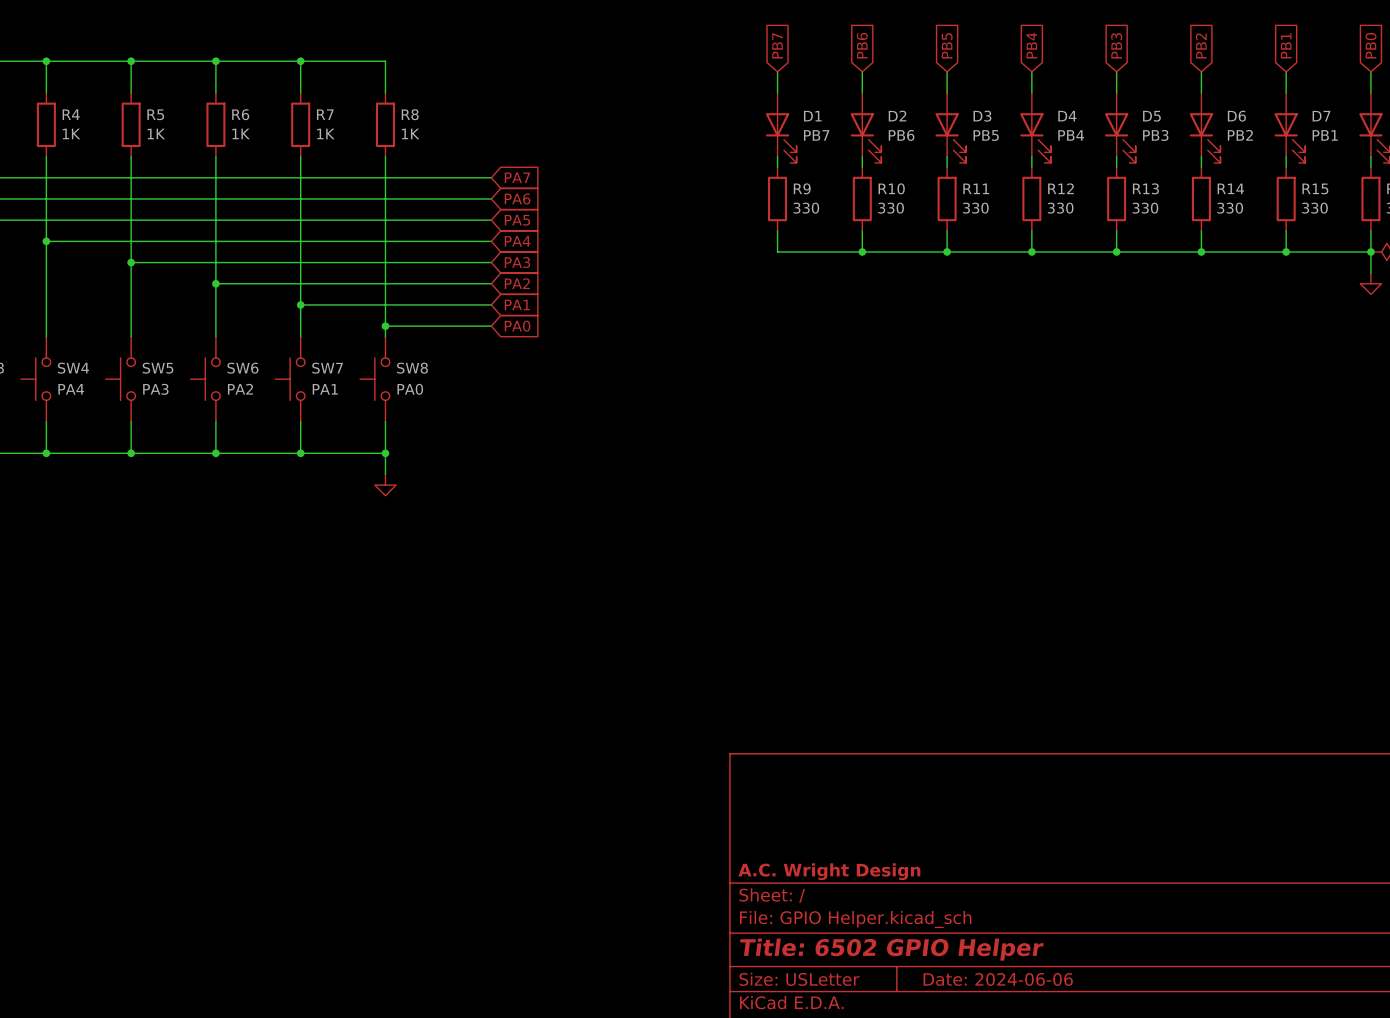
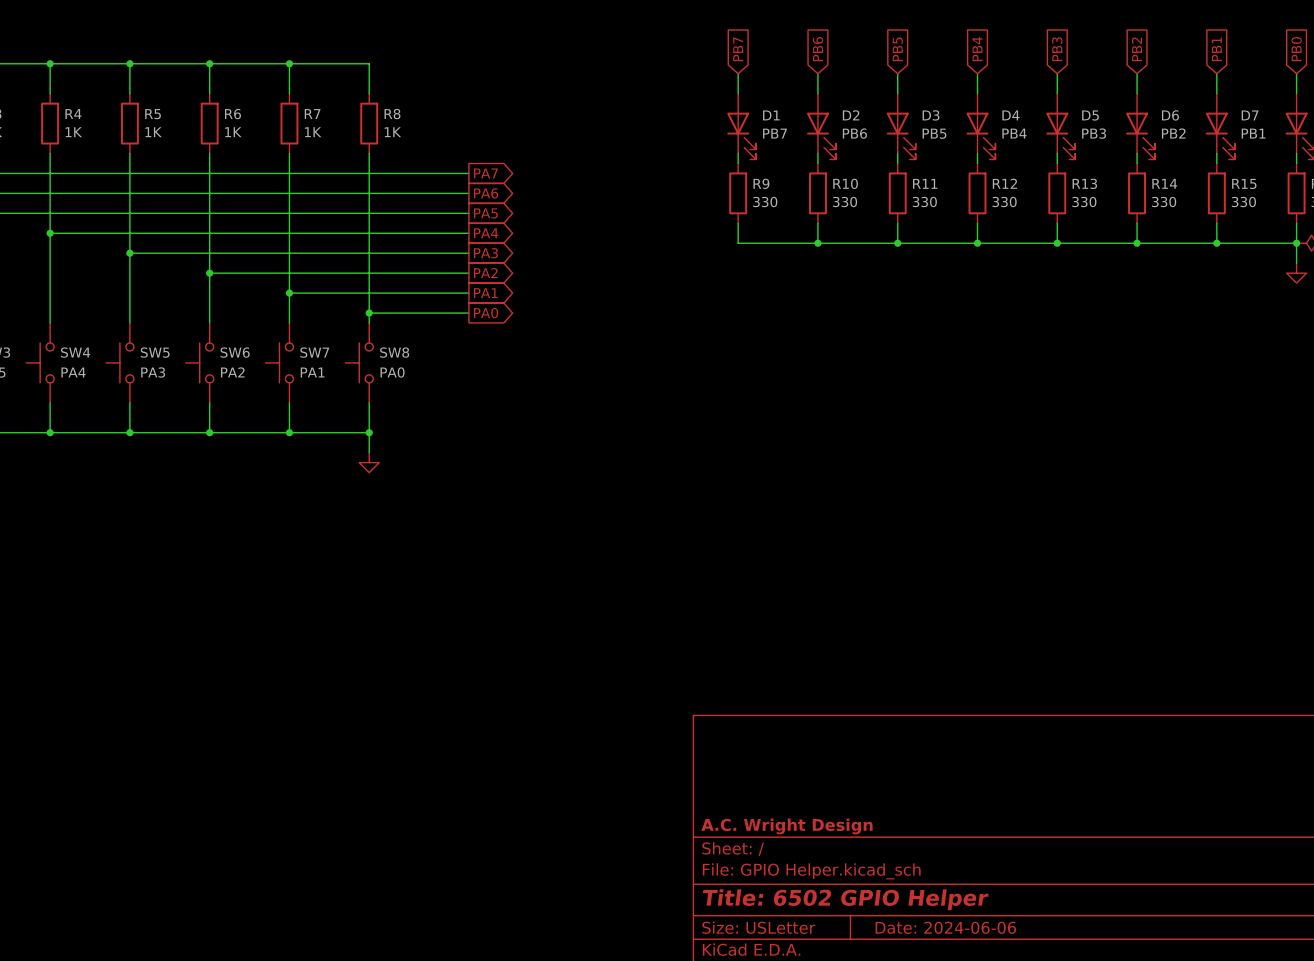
global label shape: input (517, 177) -> output (485, 173)
global label shape: input (517, 199) -> output (486, 193)
global label shape: input (517, 220) -> output (485, 213)
global label shape: input (517, 241) -> output (486, 233)
global label shape: input (517, 262) -> output (485, 253)
global label shape: input (517, 283) -> output (485, 273)
global label shape: input (517, 304) -> output (485, 293)
global label shape: input (517, 326) -> output (486, 313)

